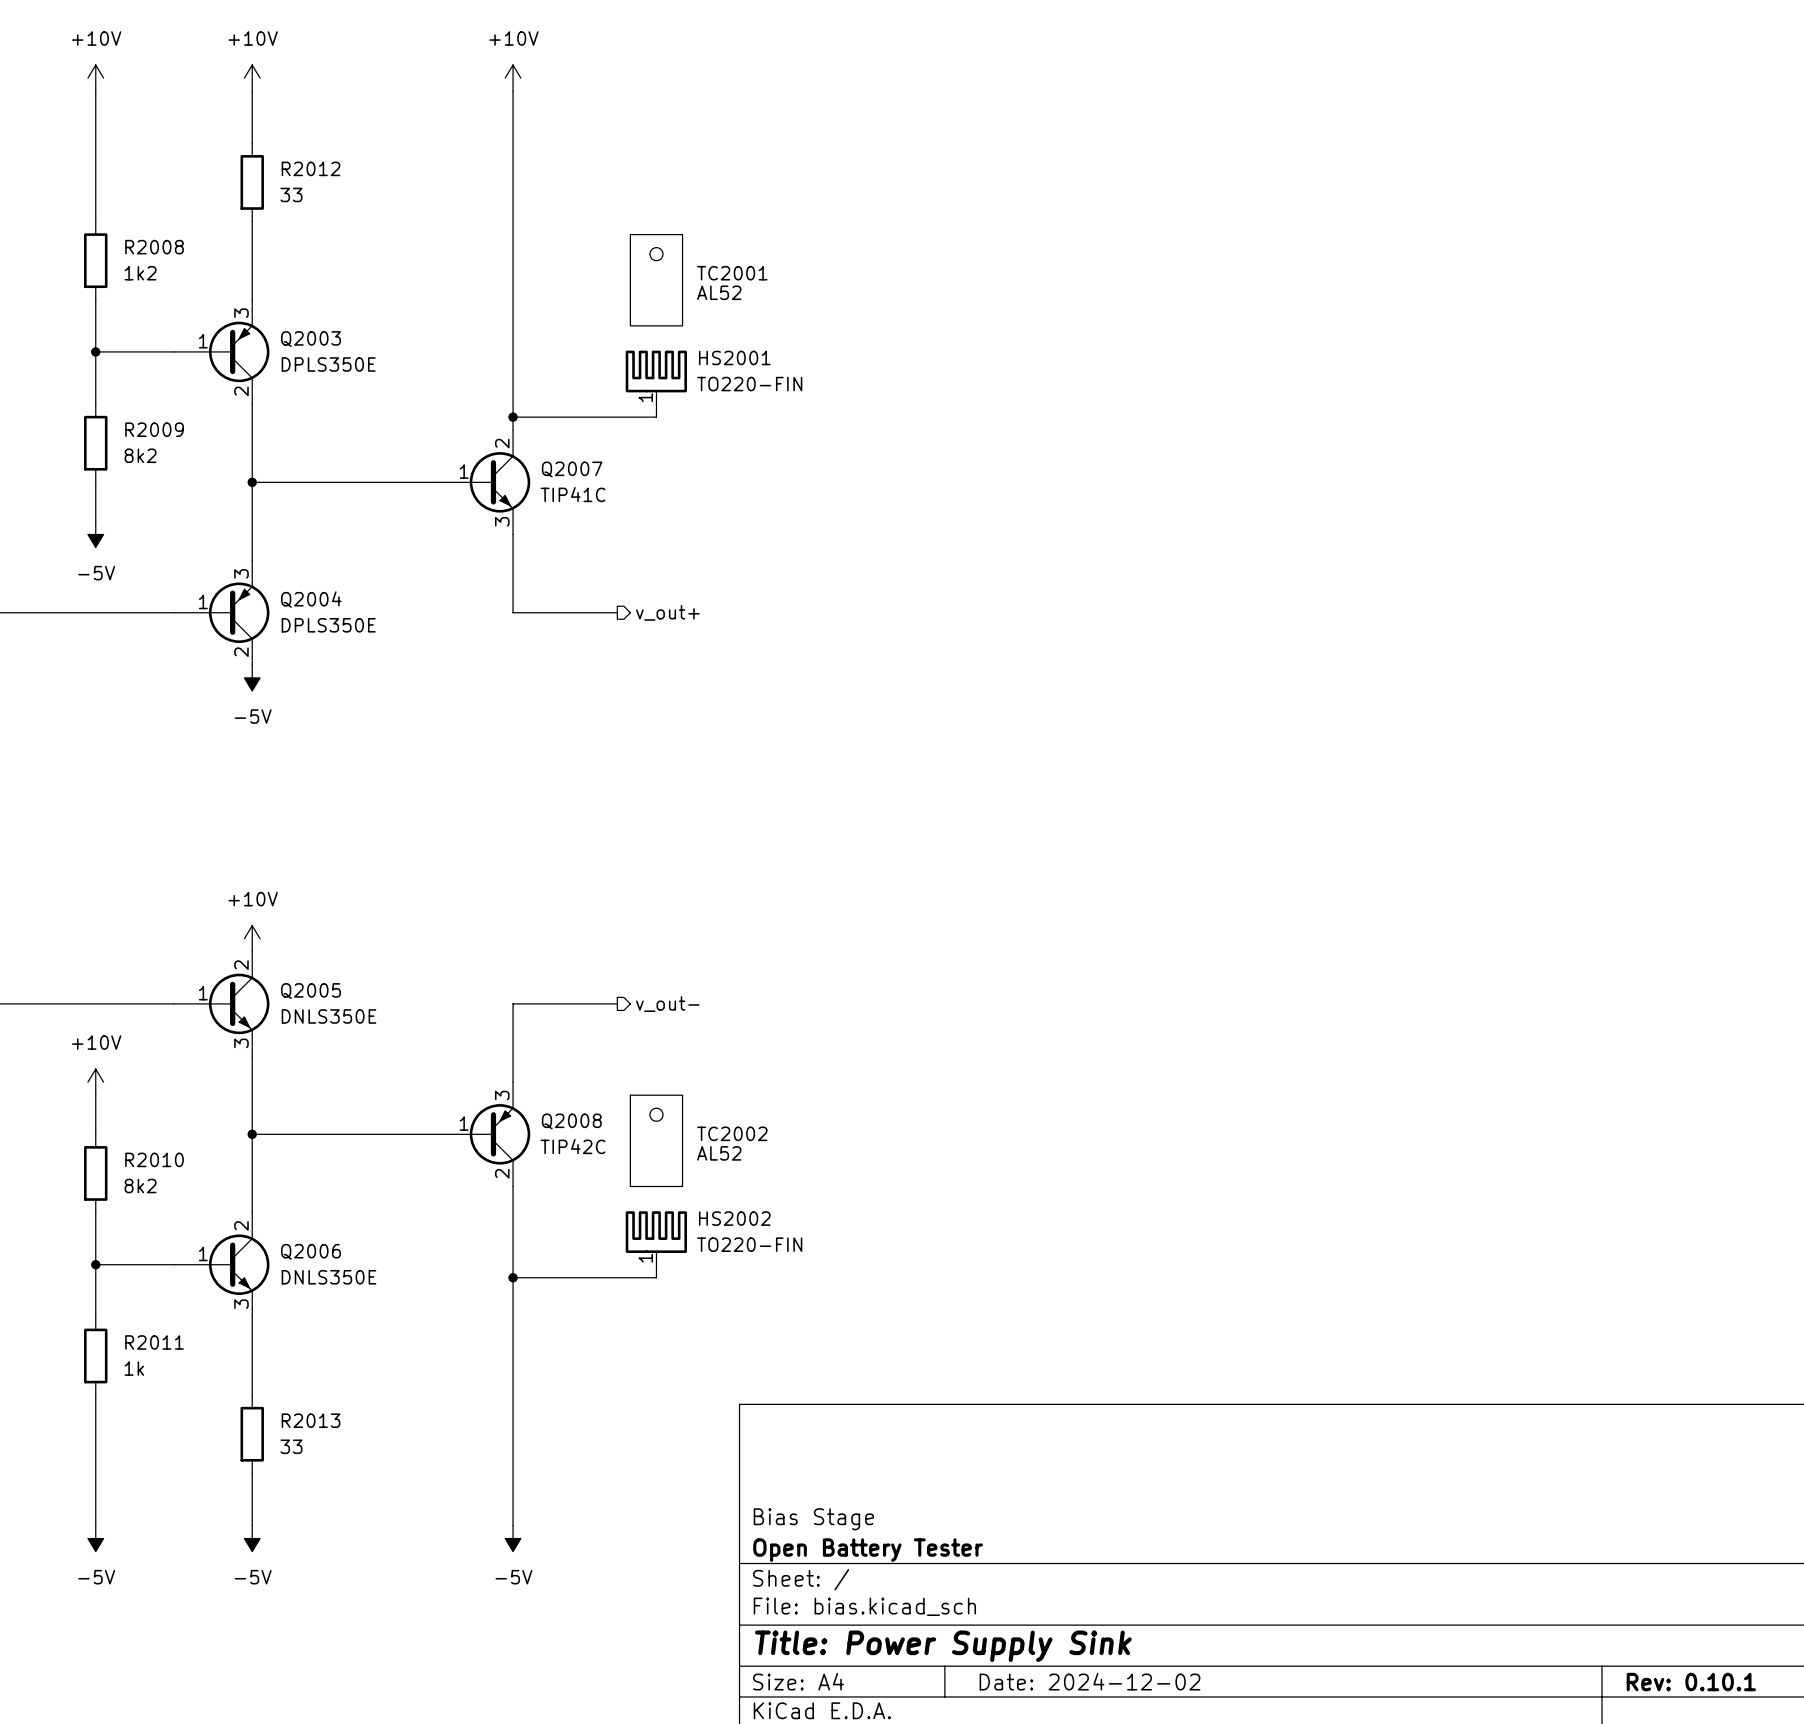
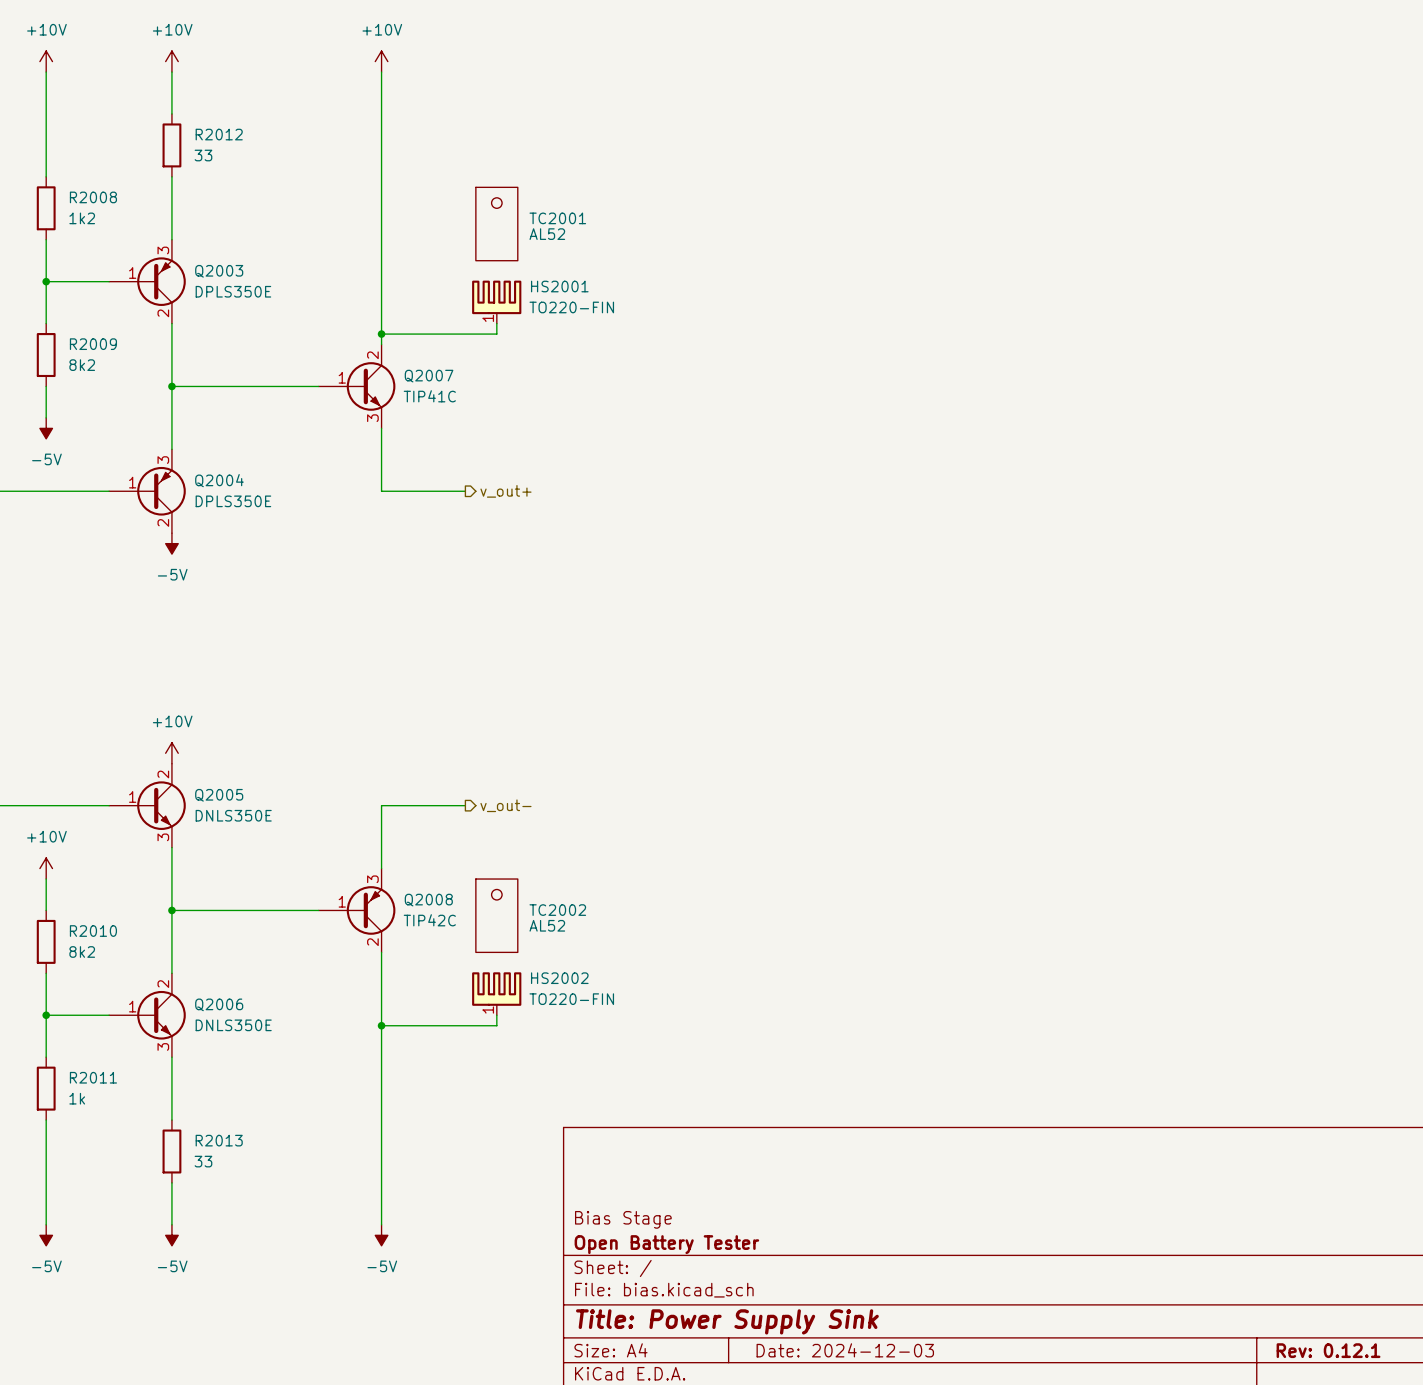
title block: Date: 2024-12-02 (1090, 1681) -> Date: 2024-12-03 (845, 1350)
title block: Rev: 0.10.1 (1691, 1682) -> Rev: 0.12.1 (1328, 1350)

